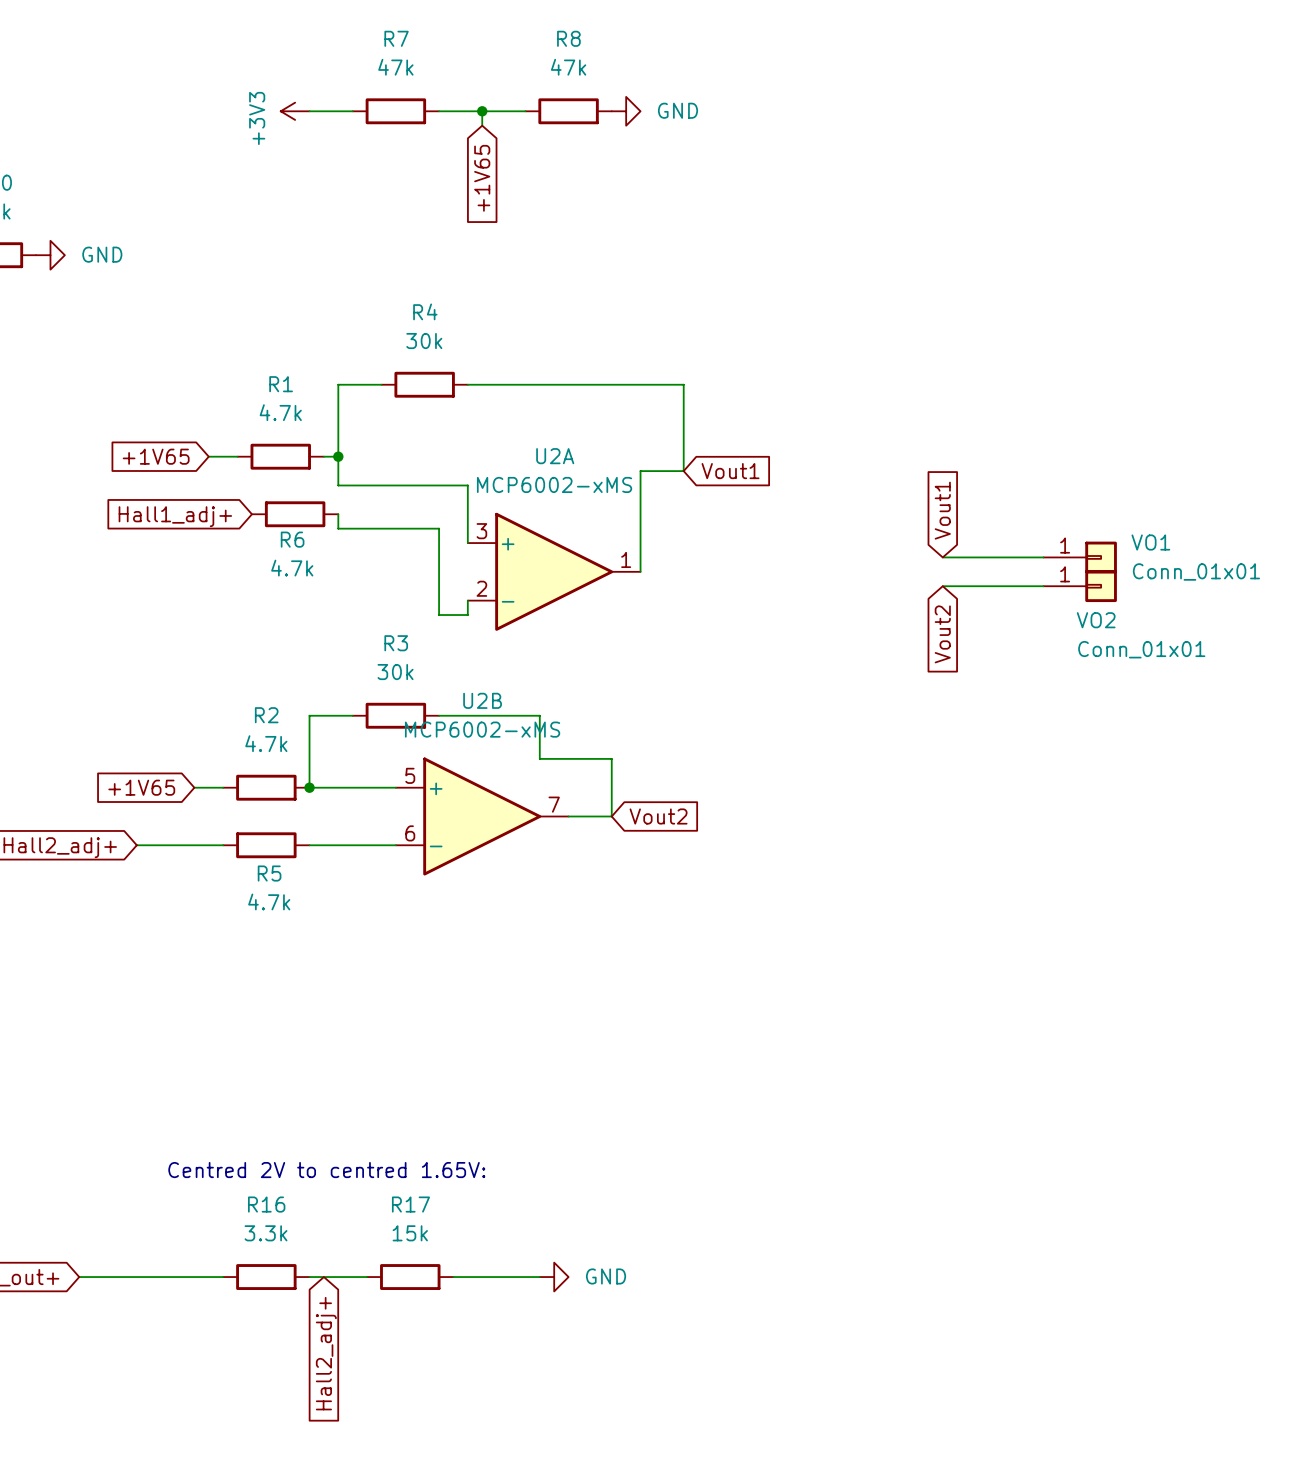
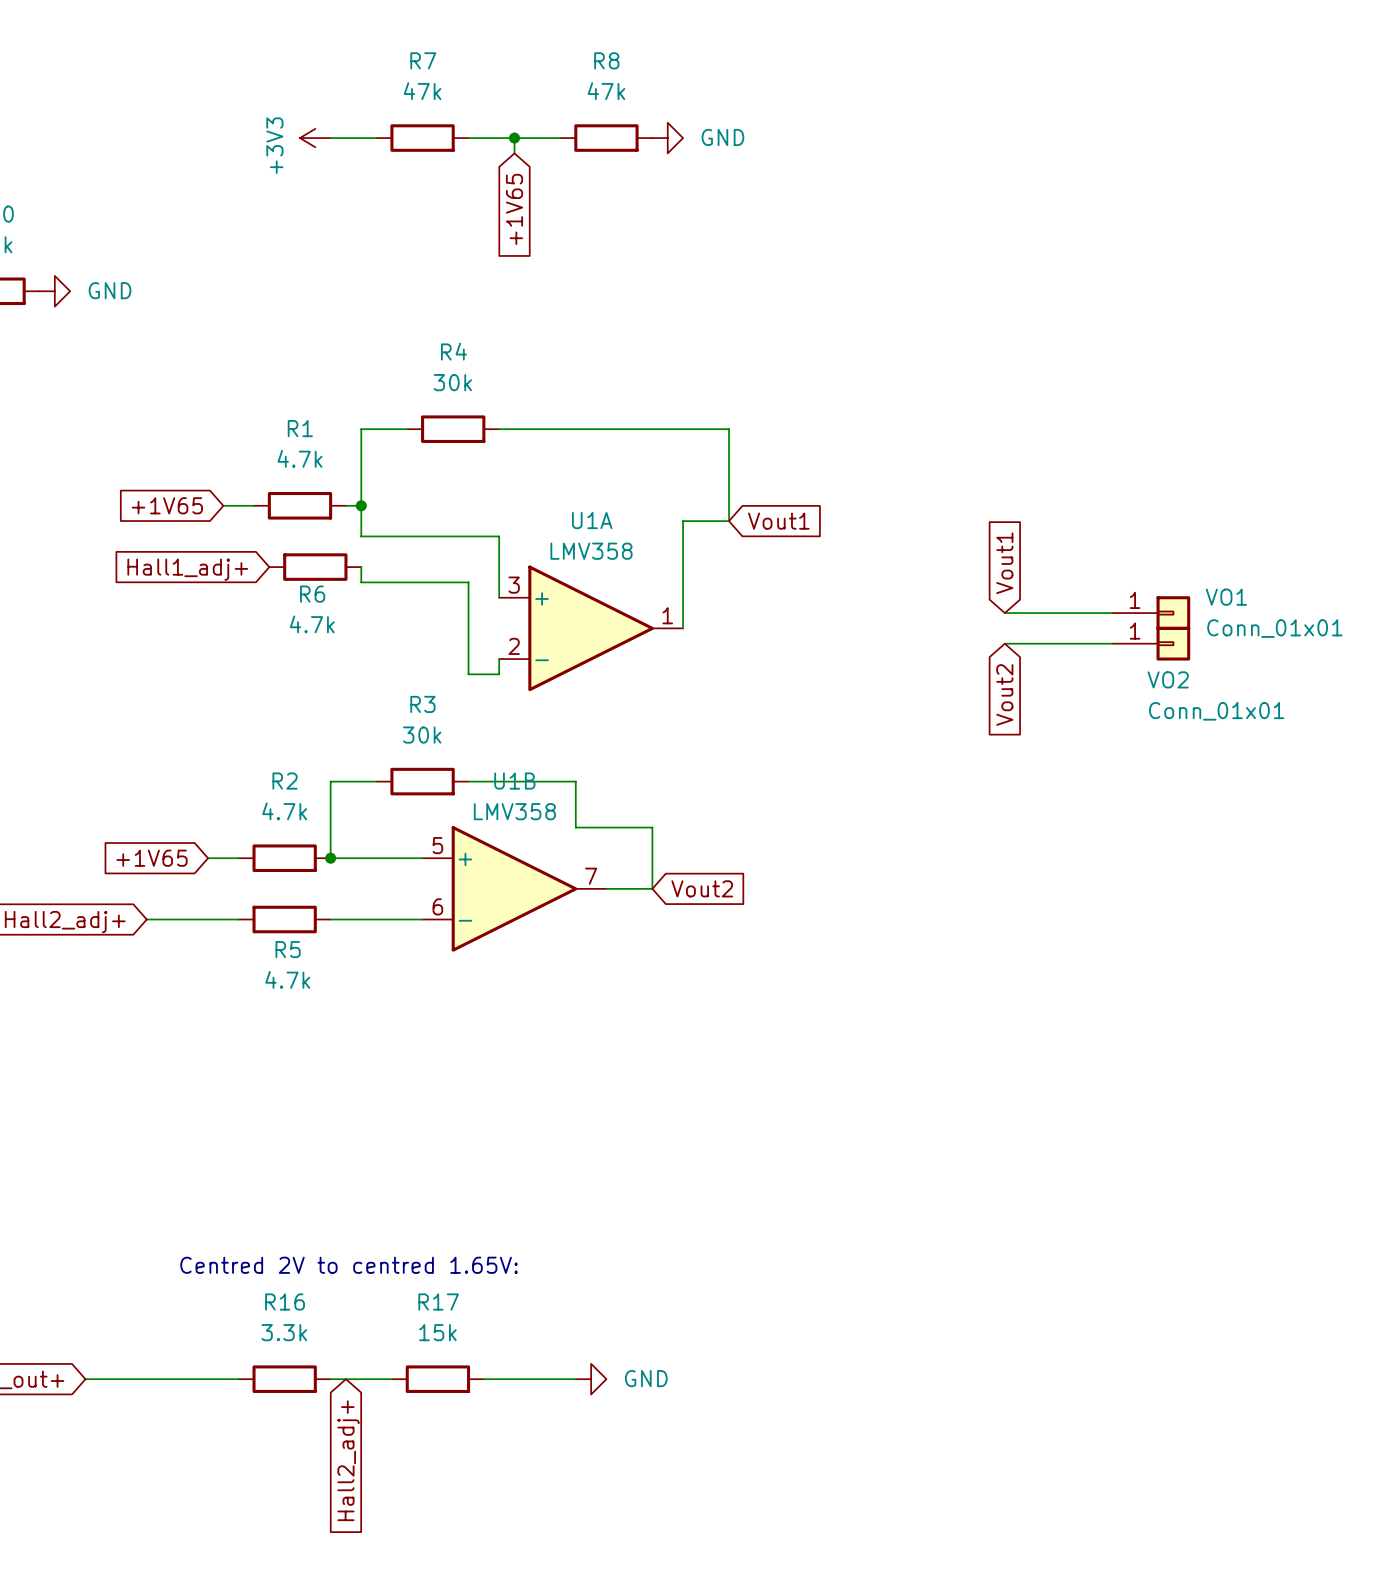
U2A name: U2A (555, 456) -> U1A (592, 520)
U2A value: MCP6002-xMS (554, 484) -> LMV358 (591, 551)
U2B name: U2B (482, 700) -> U1B (514, 781)
U2B value: MCP6002-xMS (482, 729) -> LMV358 (514, 811)

